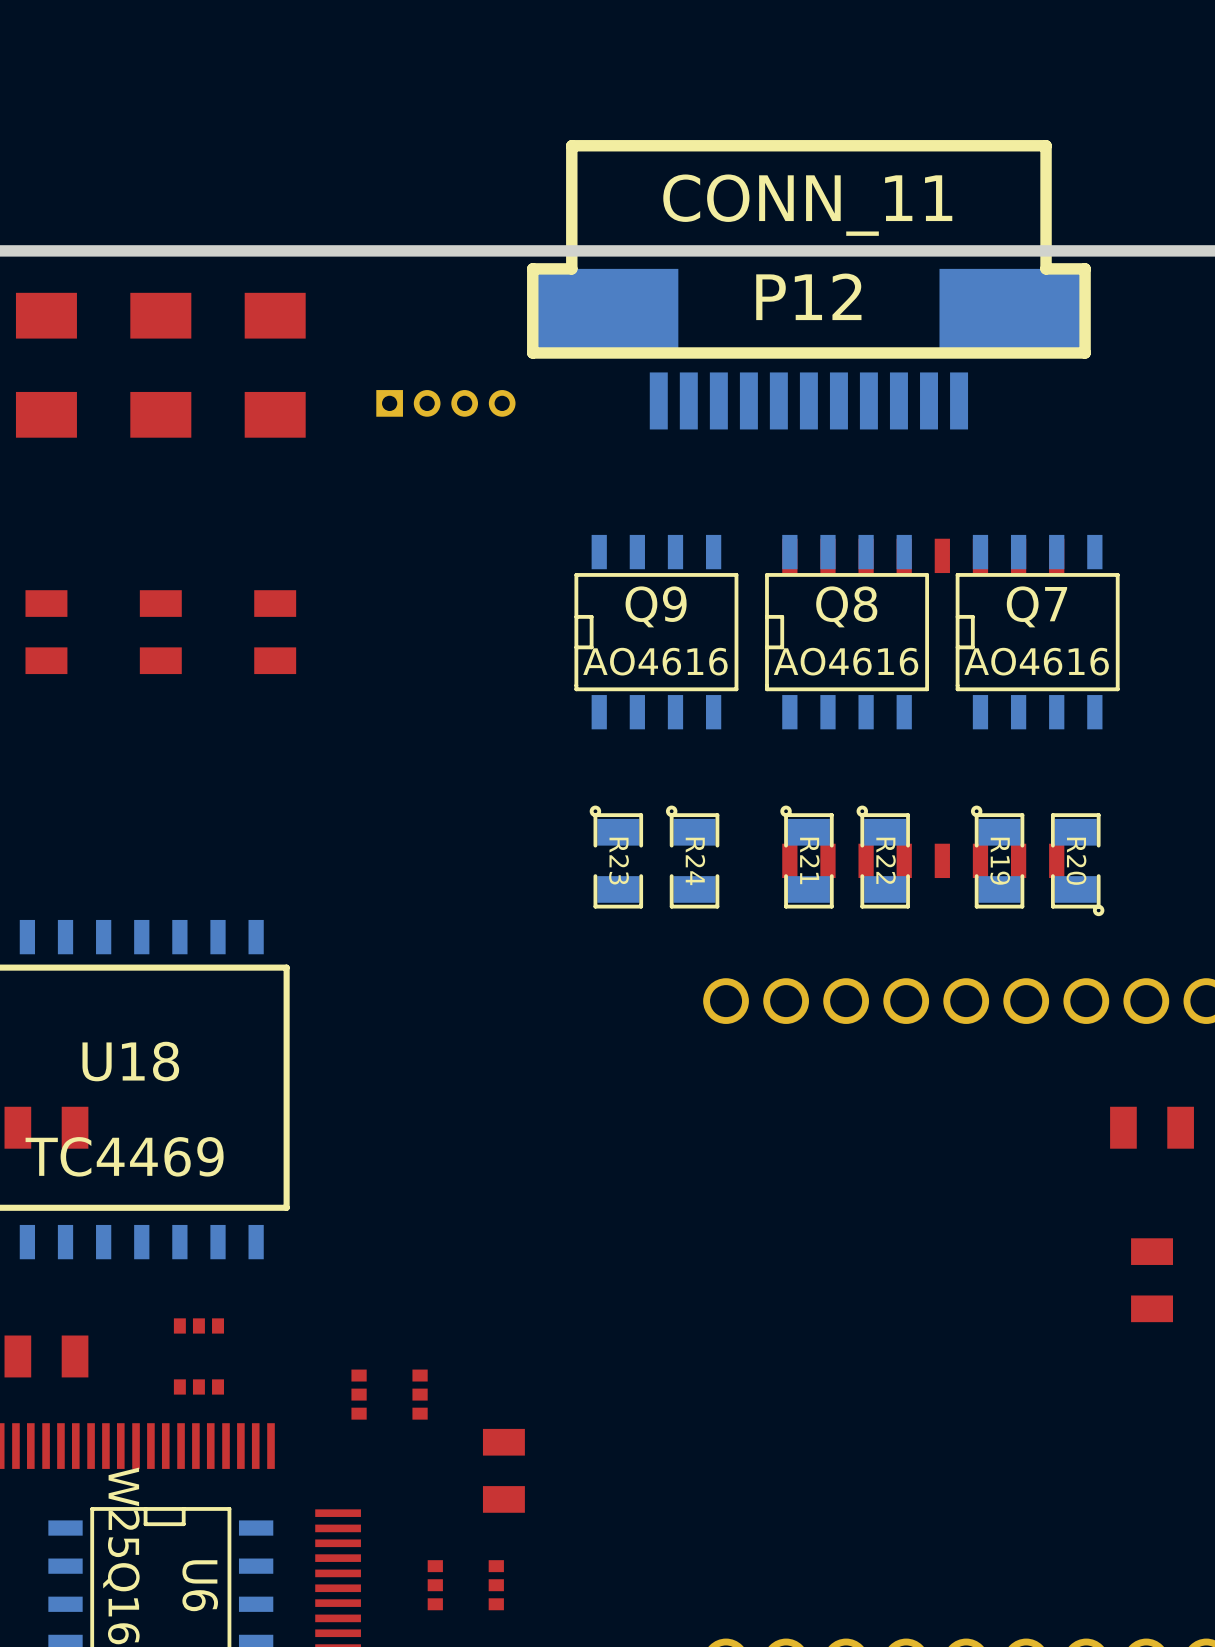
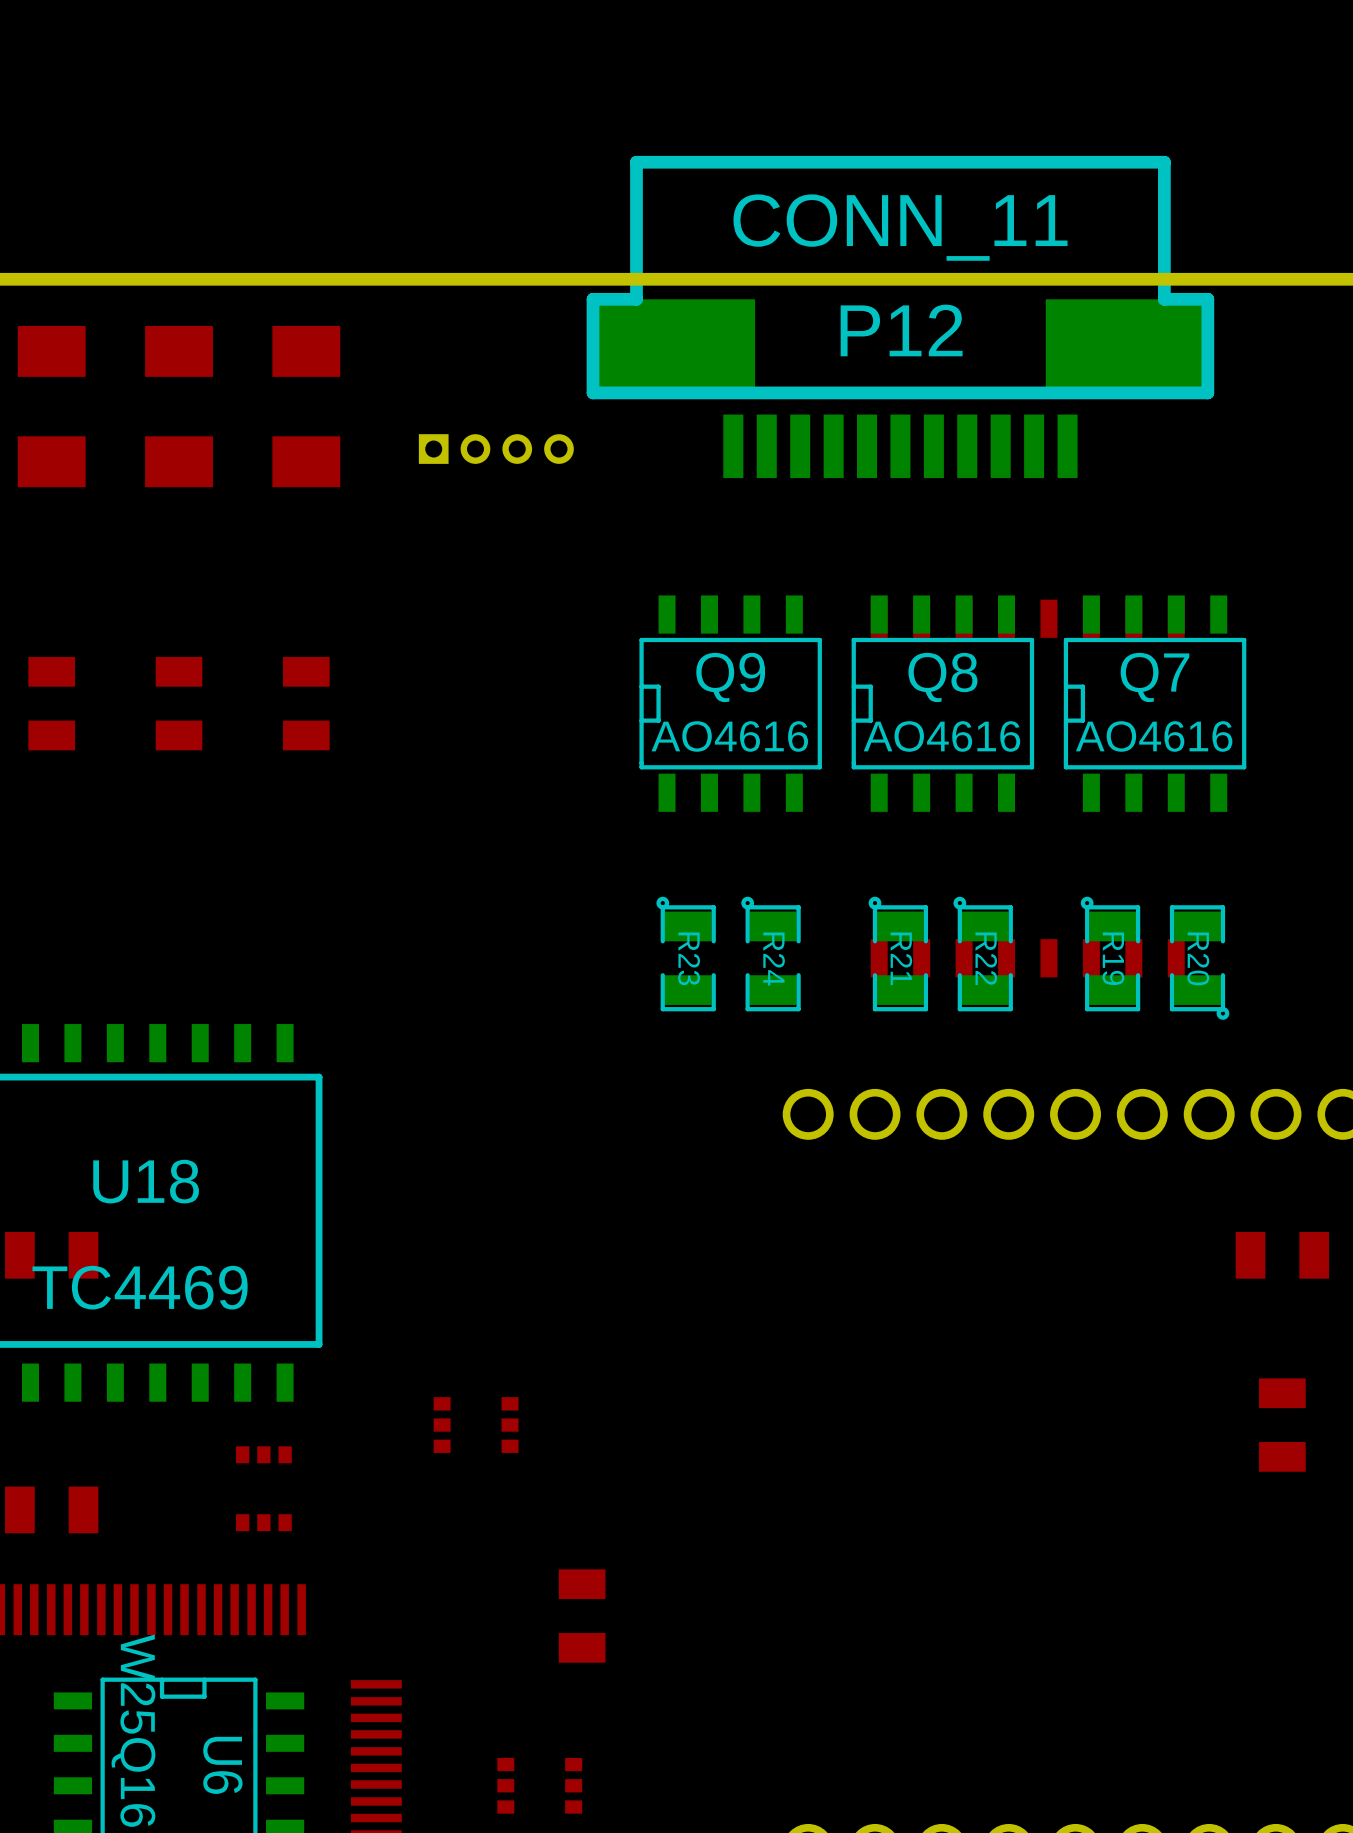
part: none -> (476, 1425)
part position: (198, 1356) -> (263, 1488)
part: (389, 1394) -> none
part position: (503, 1470) -> (582, 1616)
part position: (465, 1585) -> (539, 1785)

